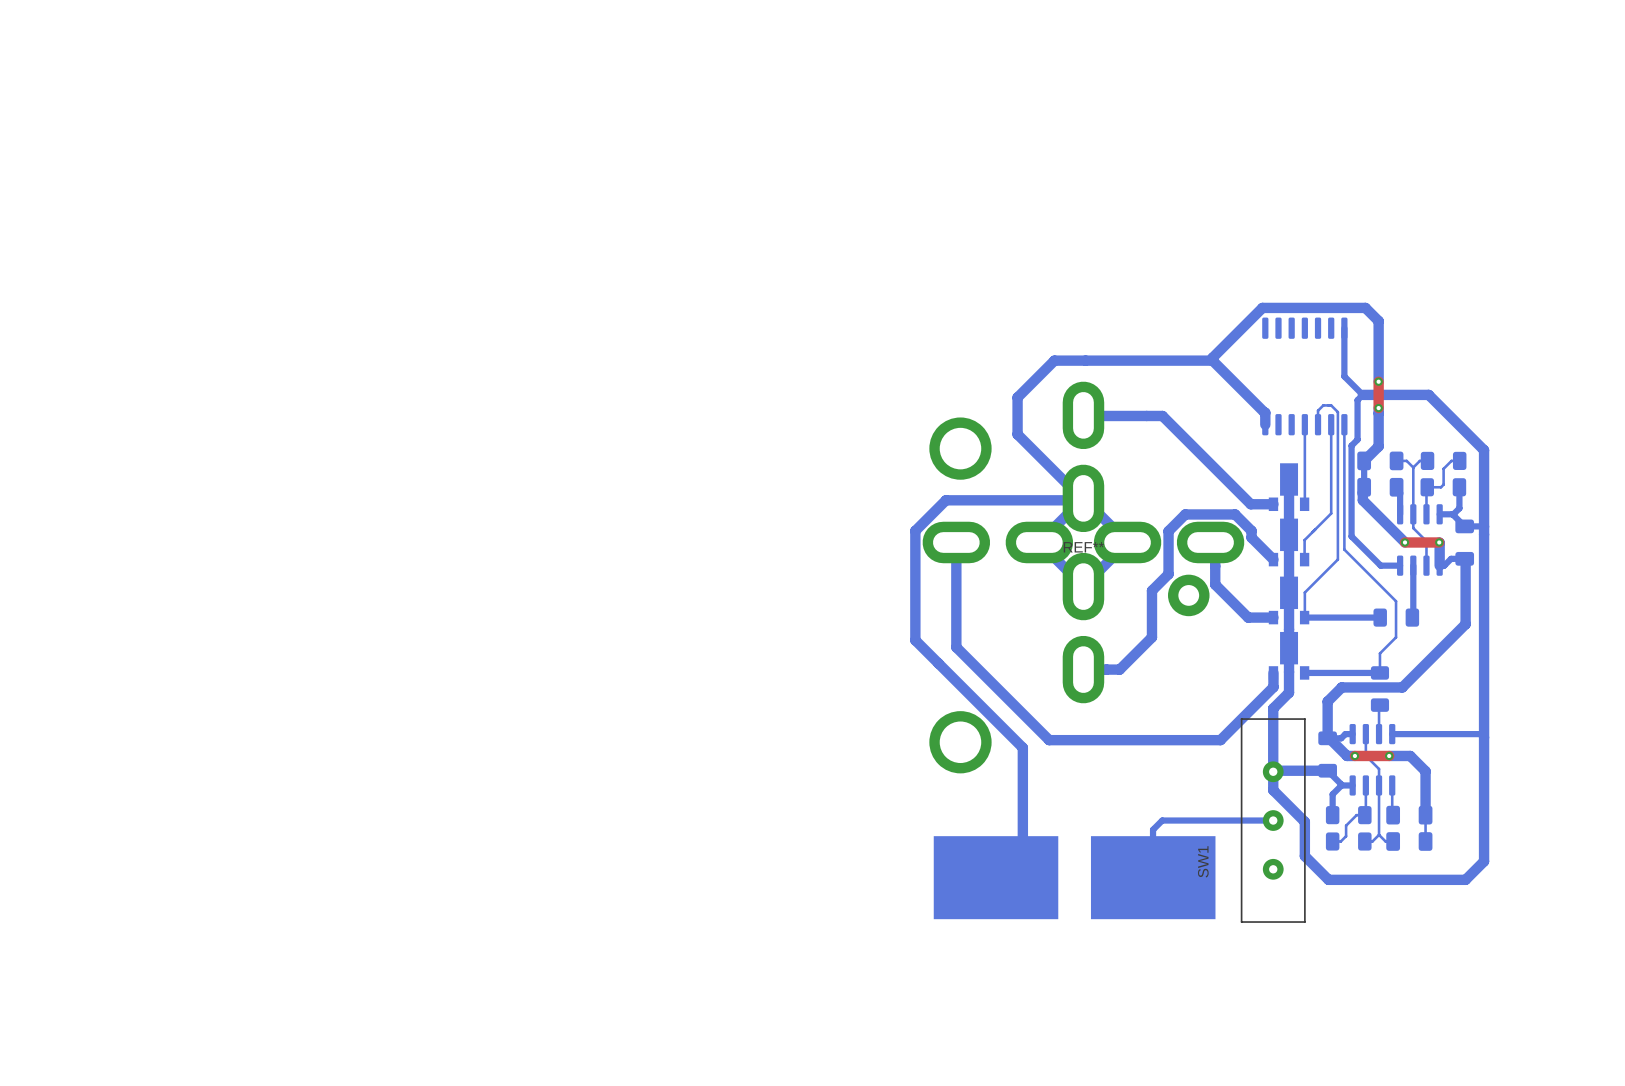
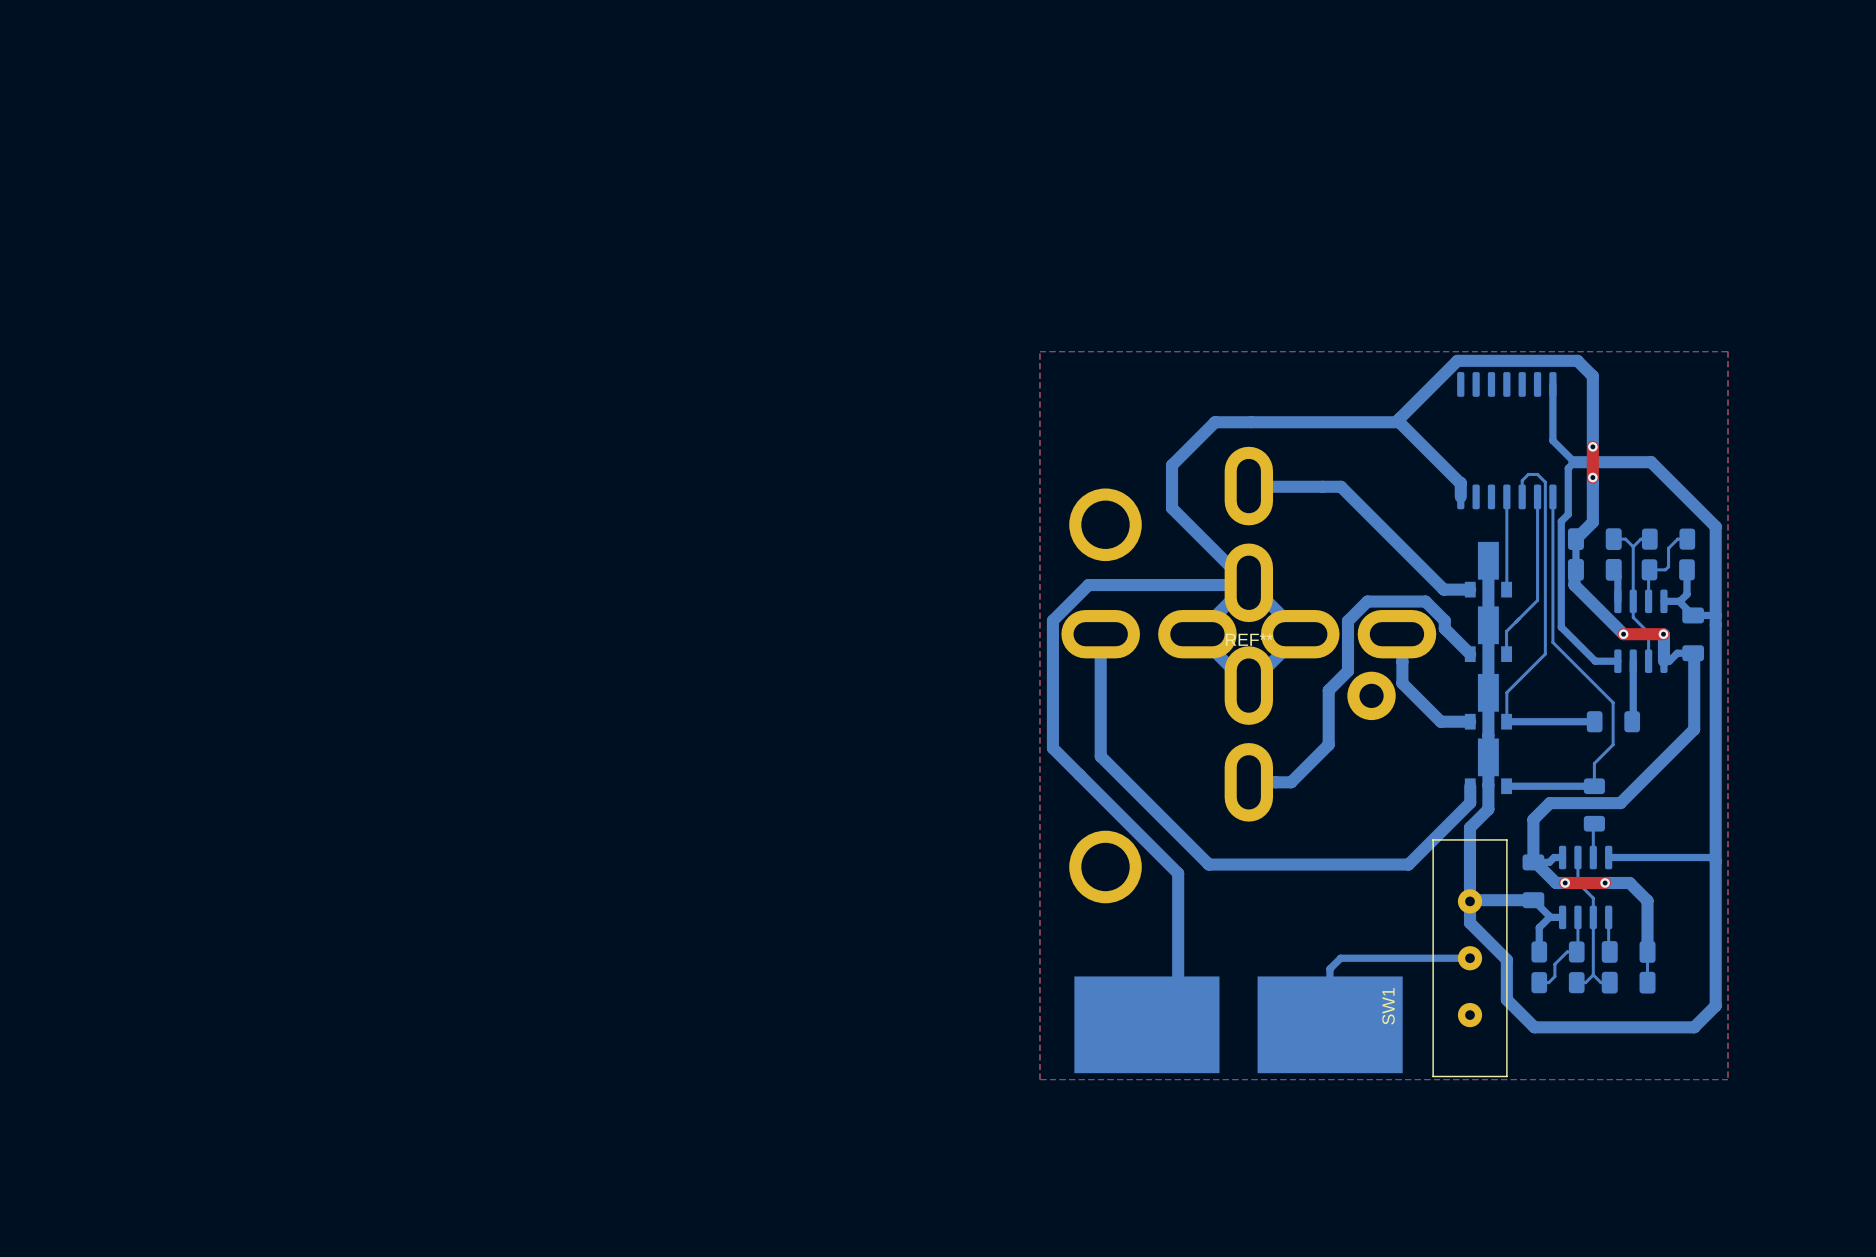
top zone outline: none -> (1039, 351) (1039, 1079) (1727, 1079) (1727, 351) (1039, 351)

